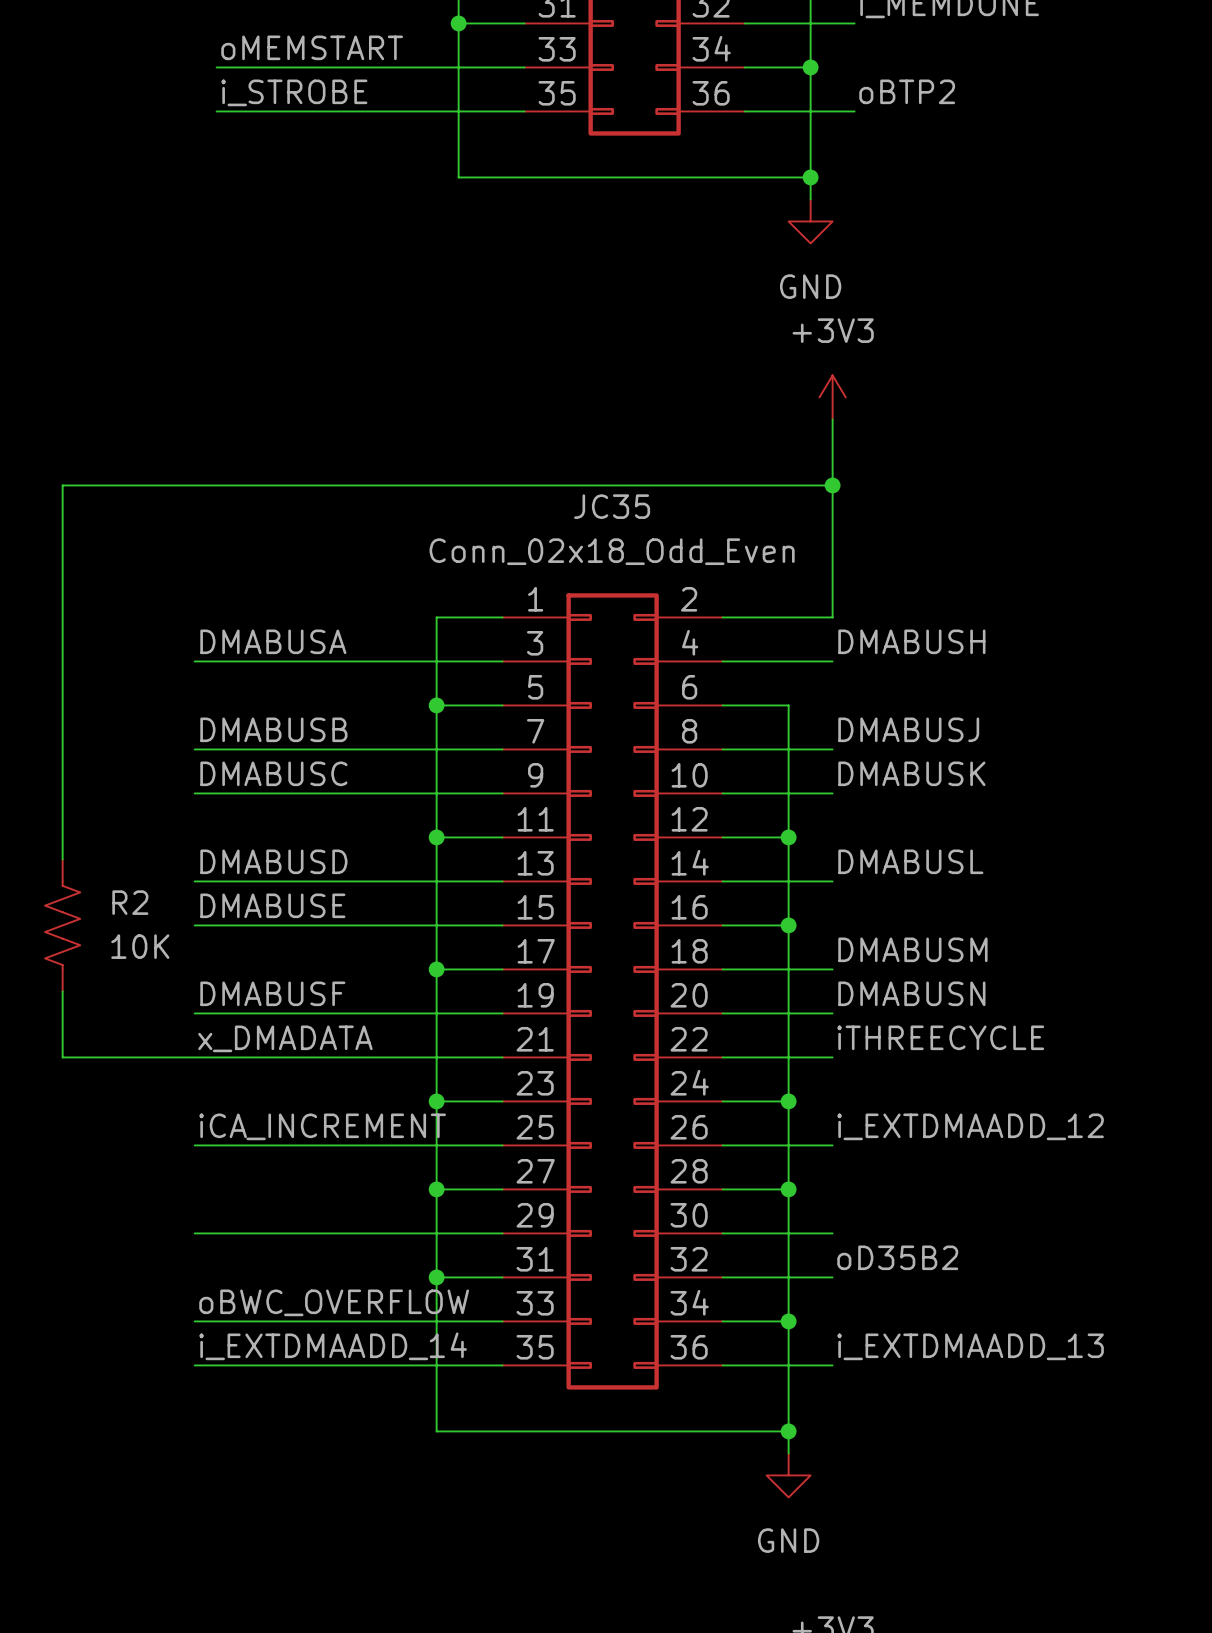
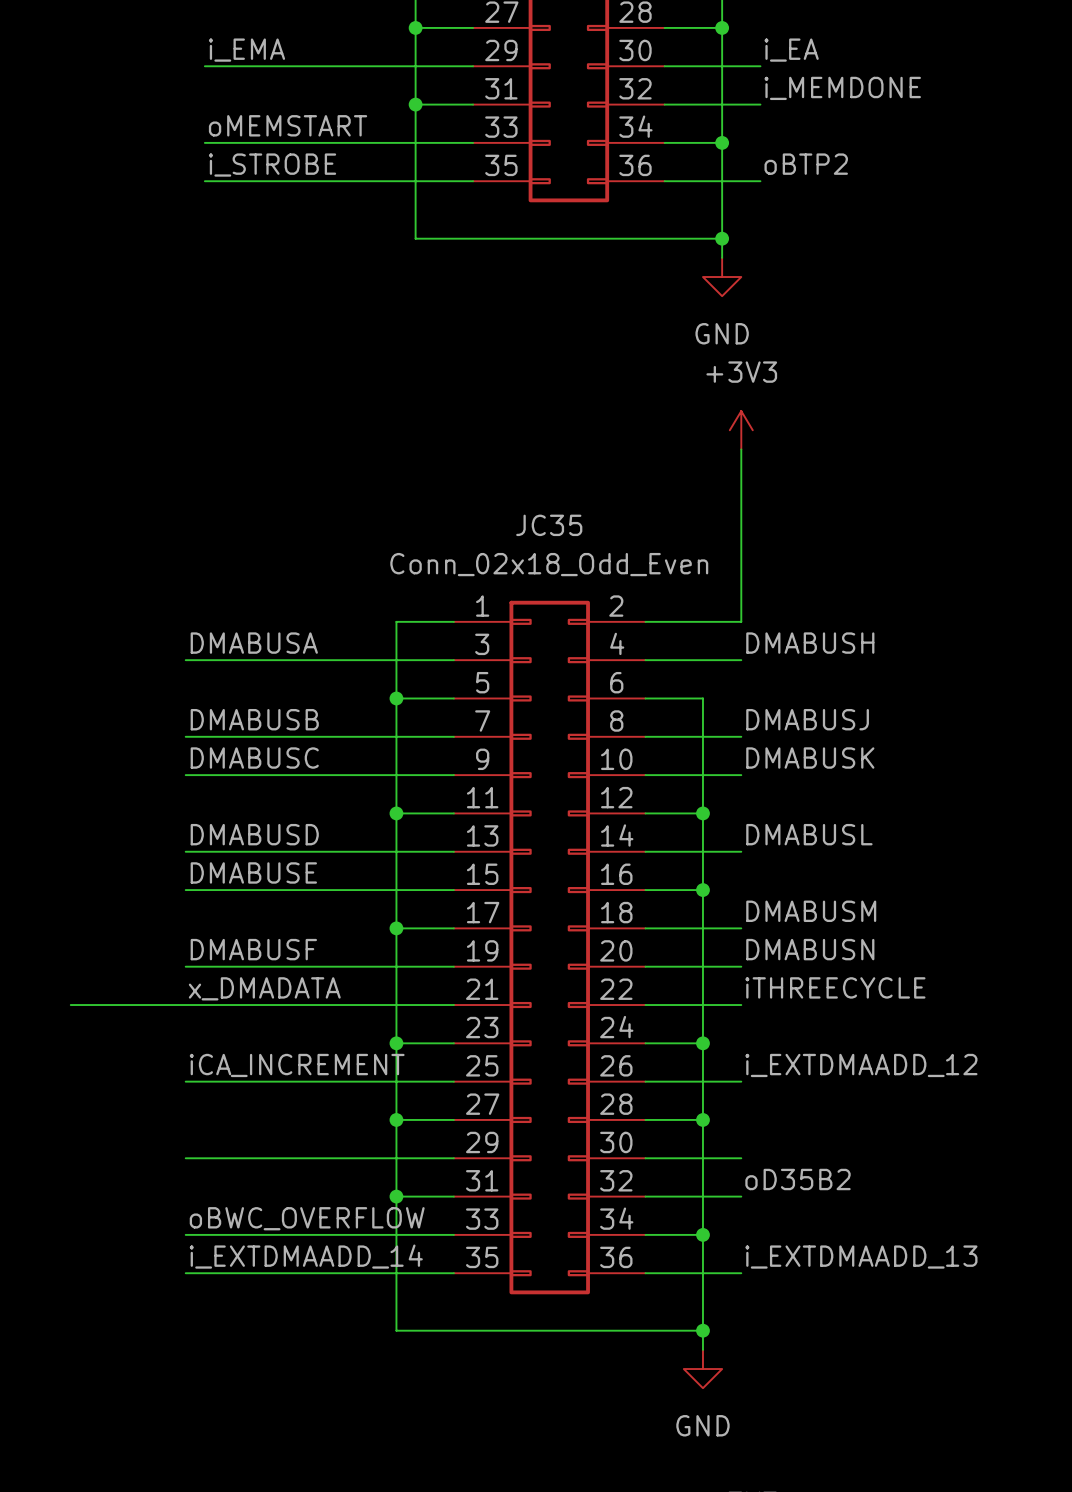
wire: (832, 485) (62, 485) (62, 859) -> none
junction: (832, 485) -> none
R2: 10K (62, 925) -> none
wire: (62, 991) (62, 1057) -> none

